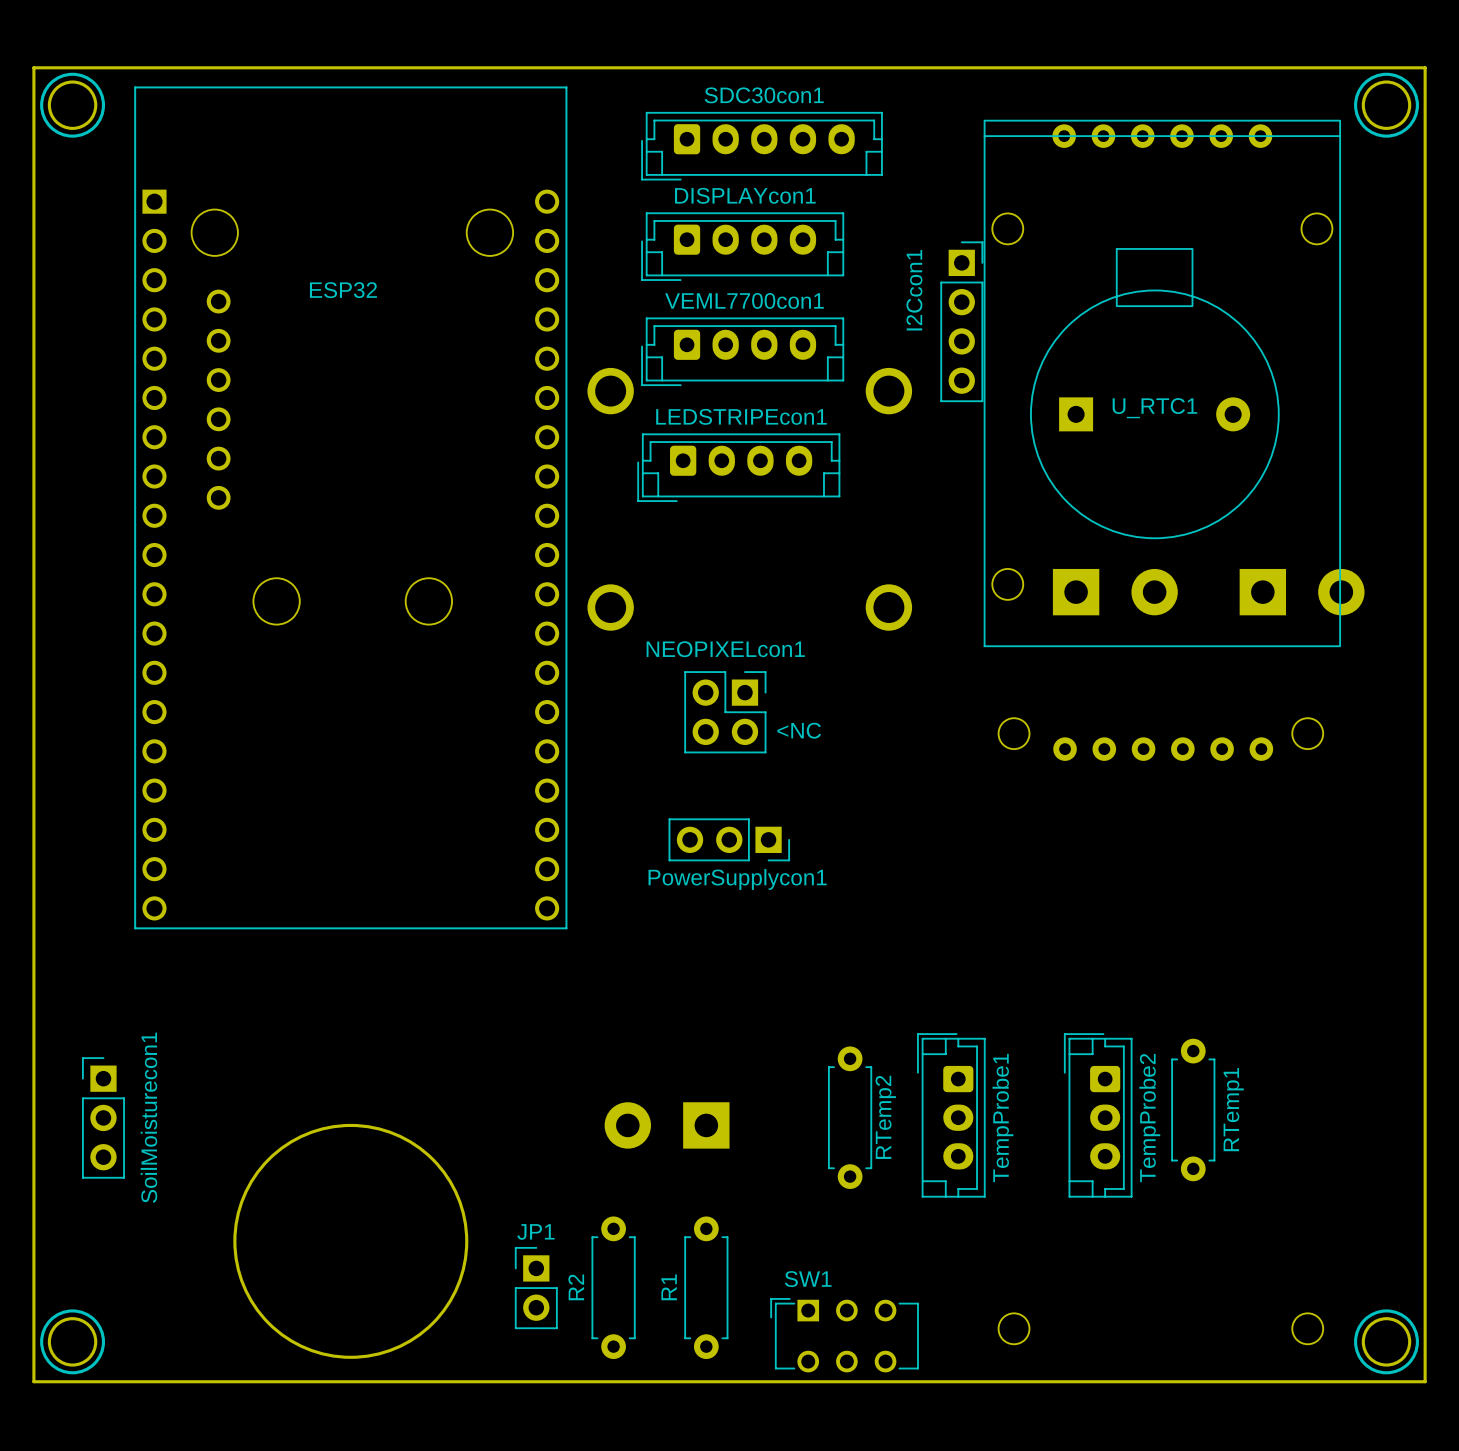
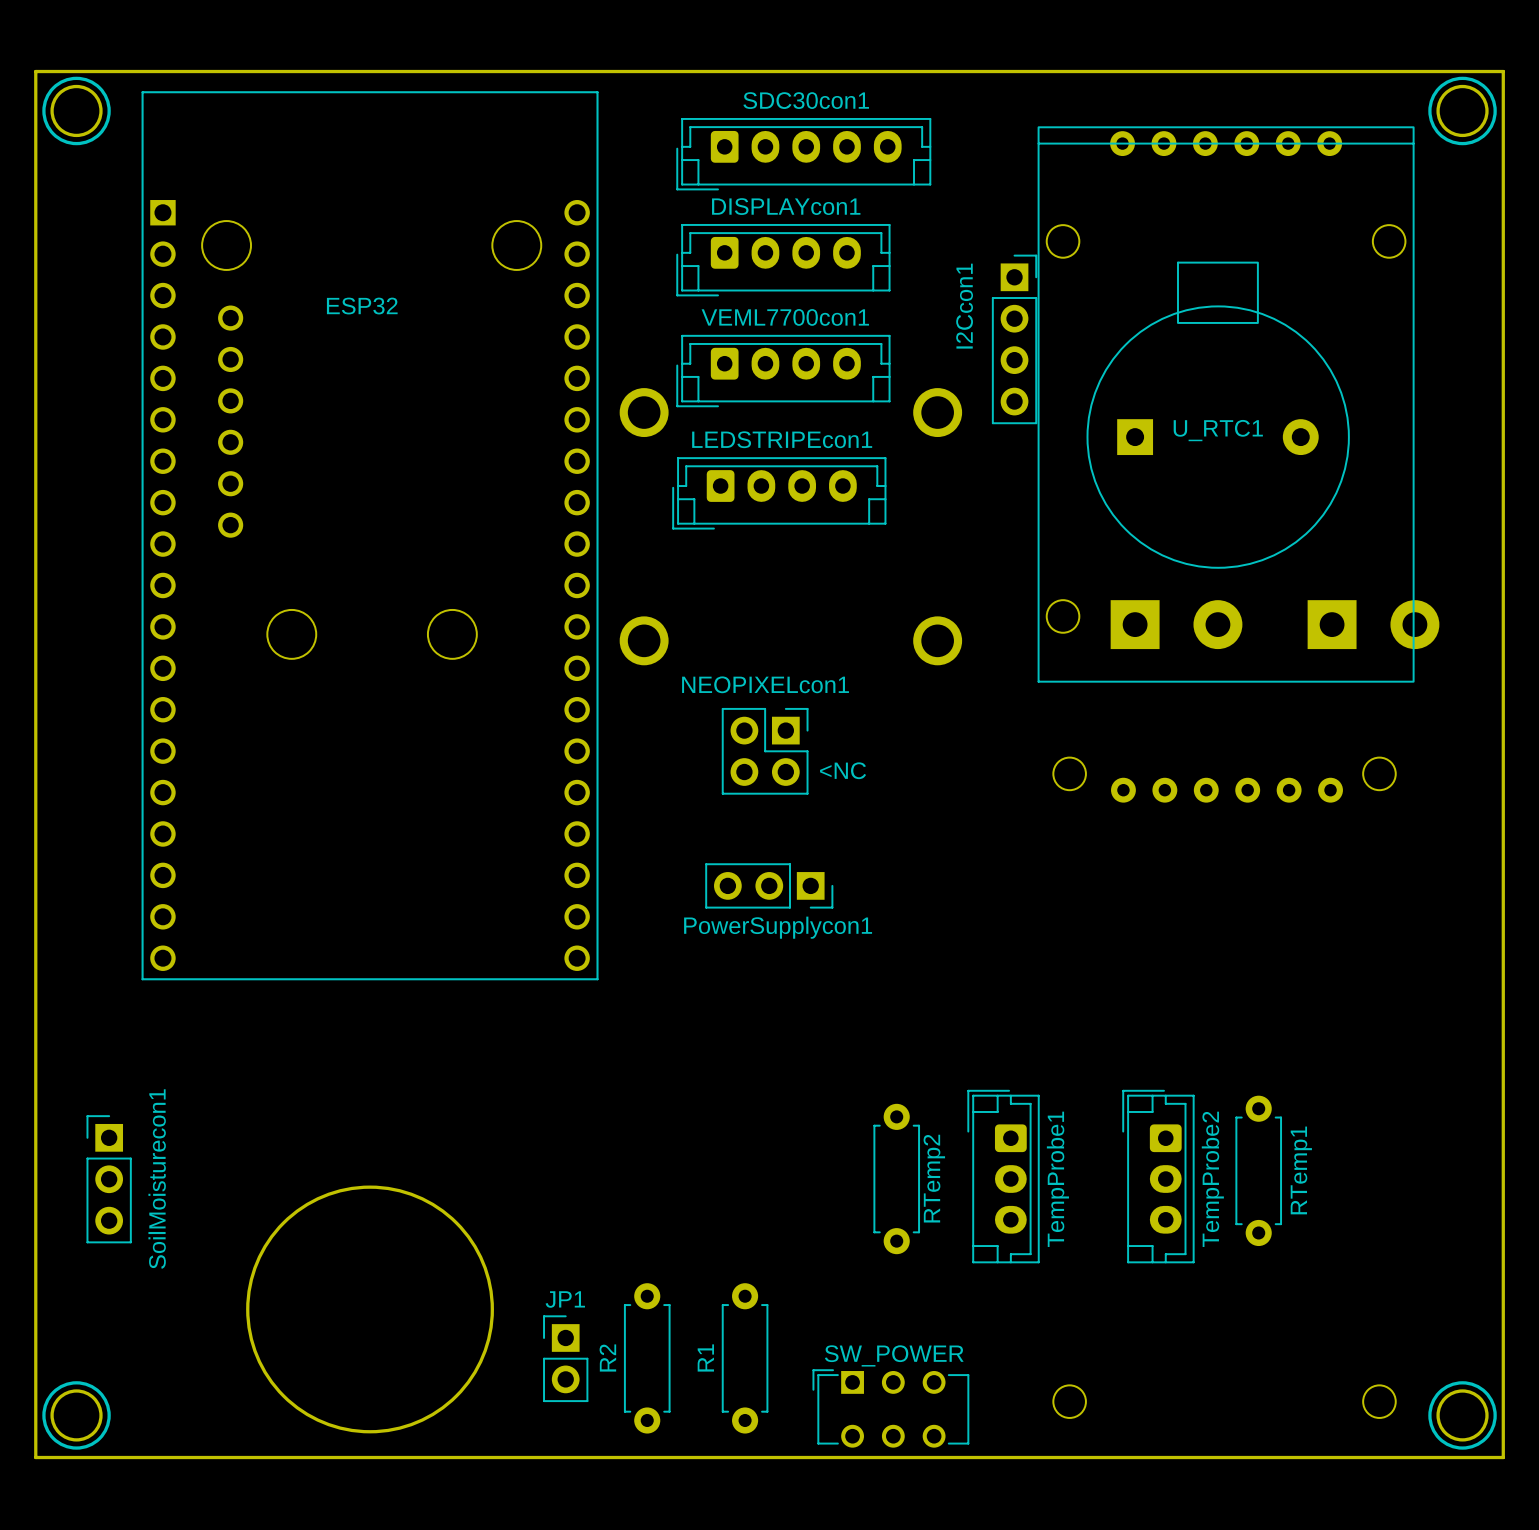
part: (667, 1125) -> none
SW1 name: SW1 (808, 1279) -> SW_POWER (894, 1355)

